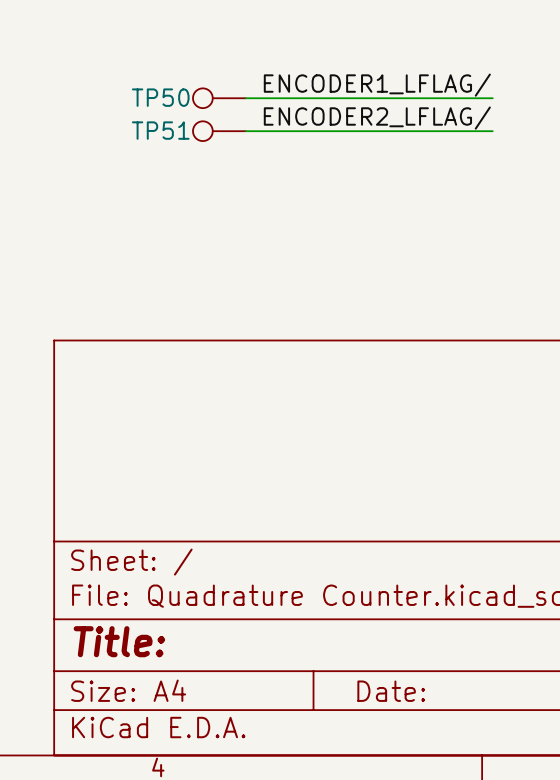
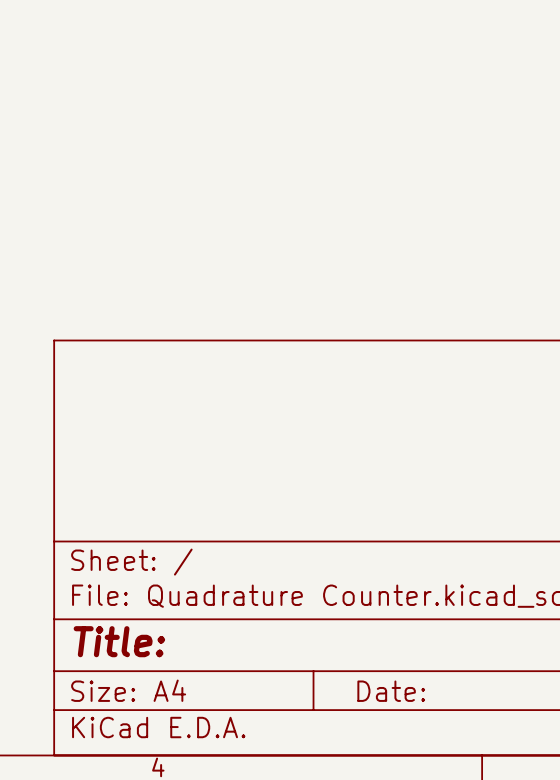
label: ENCODER1_LFLAG/ (377, 85) -> none
TP50: (219, 98) -> none
wire: (245, 98) (492, 98) -> none
label: ENCODER2_LFLAG/ (377, 118) -> none
TP51: (219, 131) -> none
wire: (245, 131) (492, 131) -> none

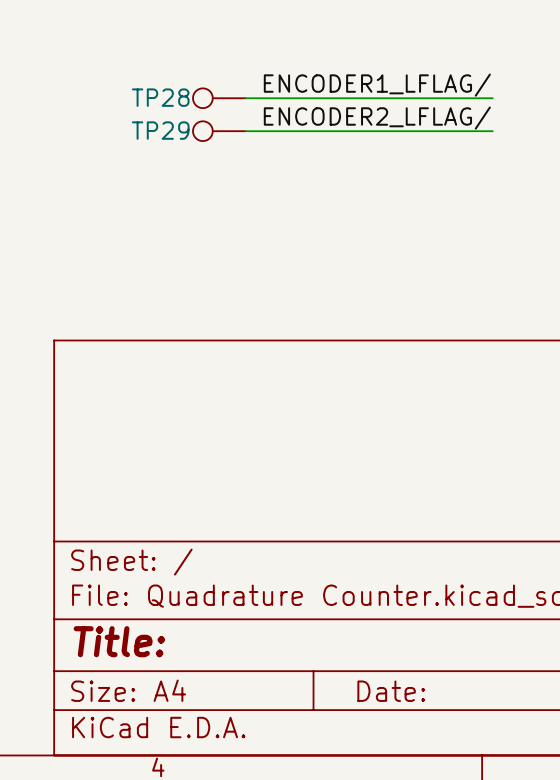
label: none -> ENCODER1_LFLAG/ (377, 85)
TP28: none -> (219, 98)
wire: none -> (245, 98) (492, 98)
label: none -> ENCODER2_LFLAG/ (377, 118)
TP29: none -> (219, 131)
wire: none -> (245, 131) (492, 131)

